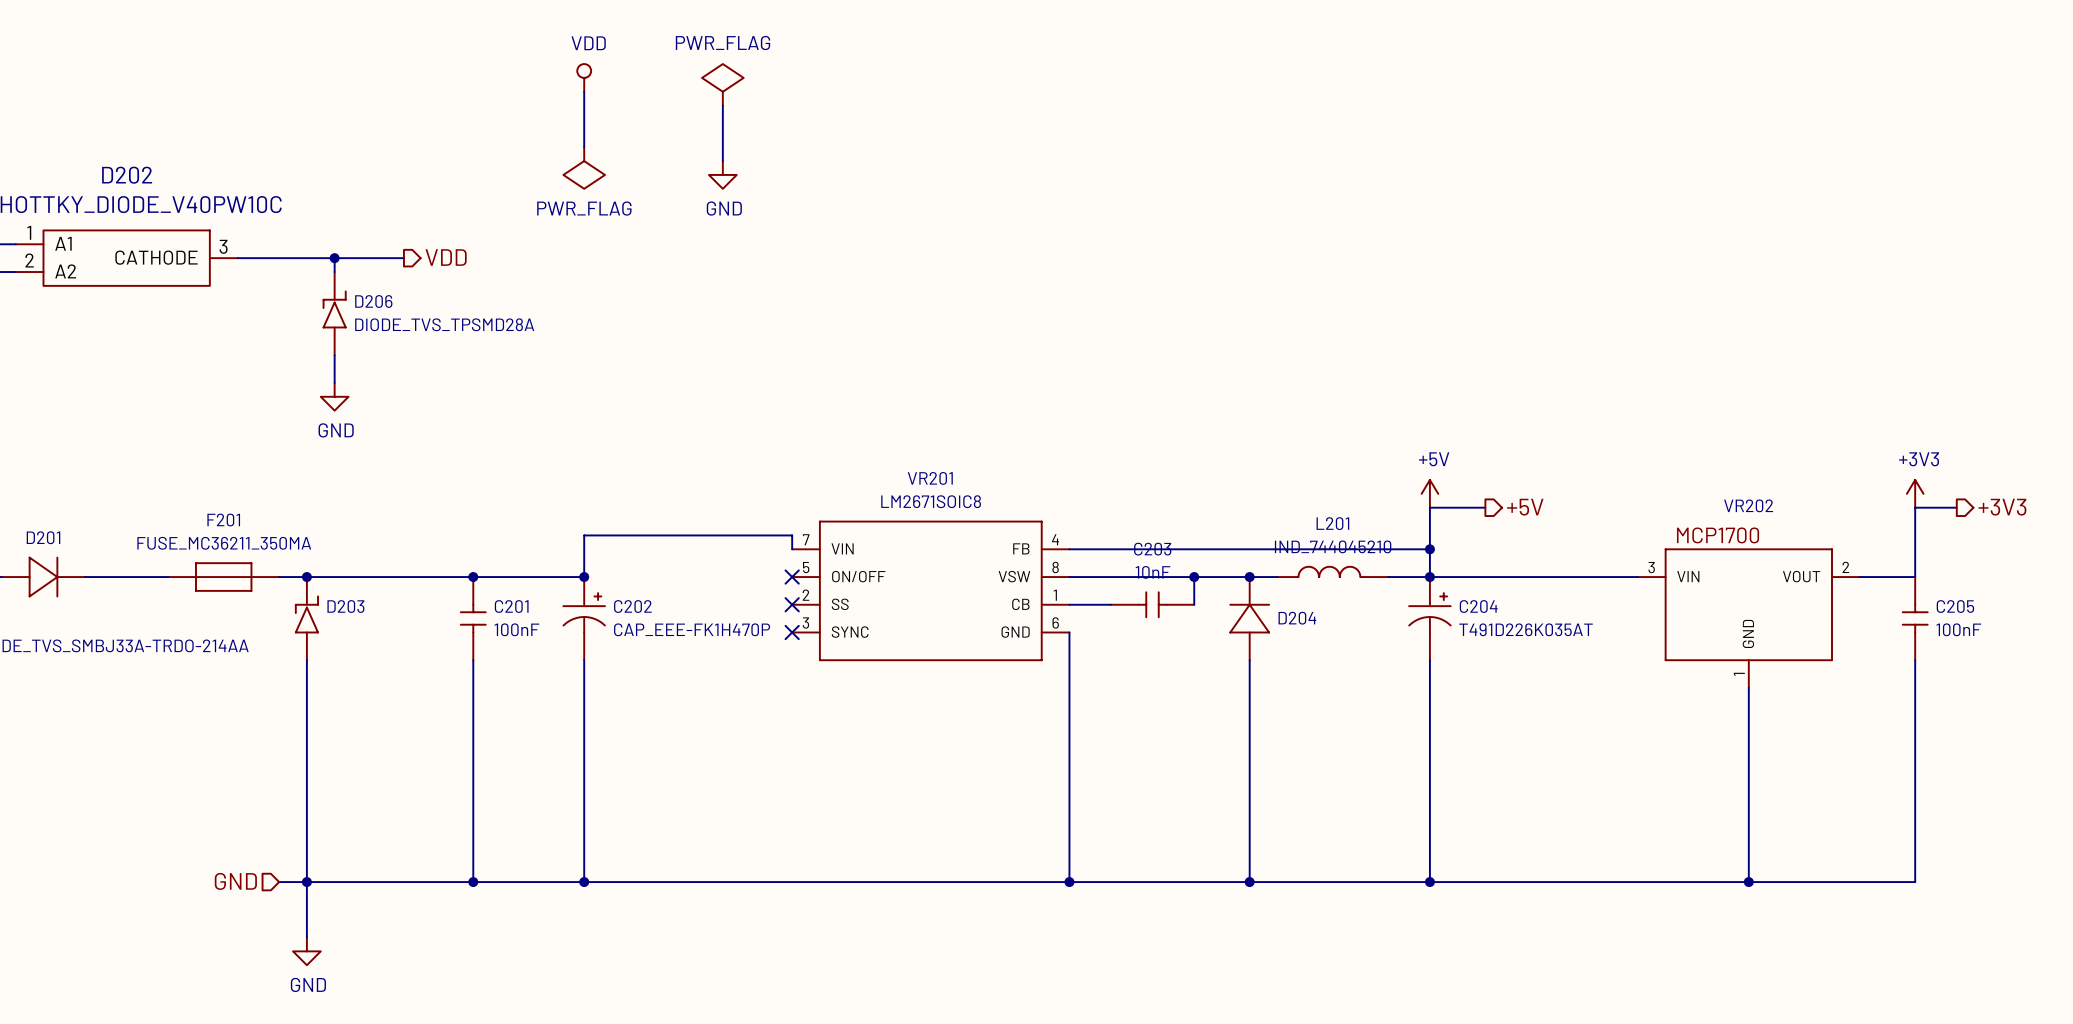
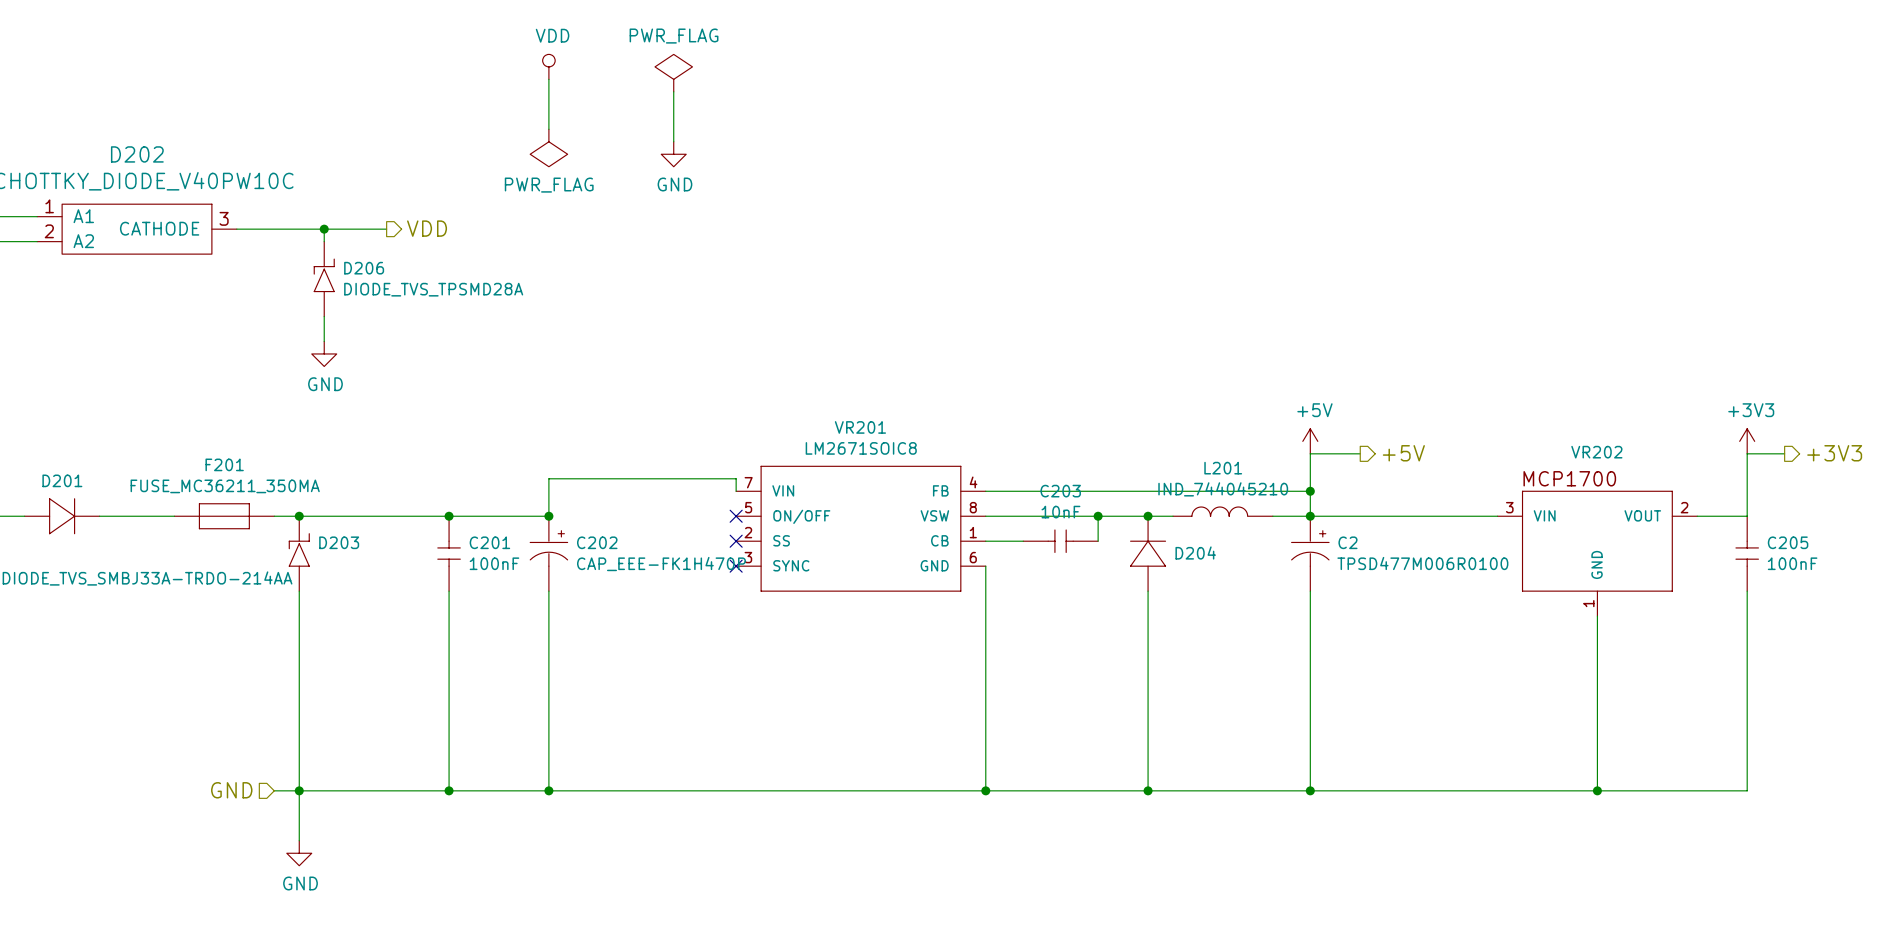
C204 name: C204 (1478, 606) -> C2 (1347, 542)
C204 value: T491D226K035AT (1526, 629) -> TPSD477M006R0100 (1422, 563)

